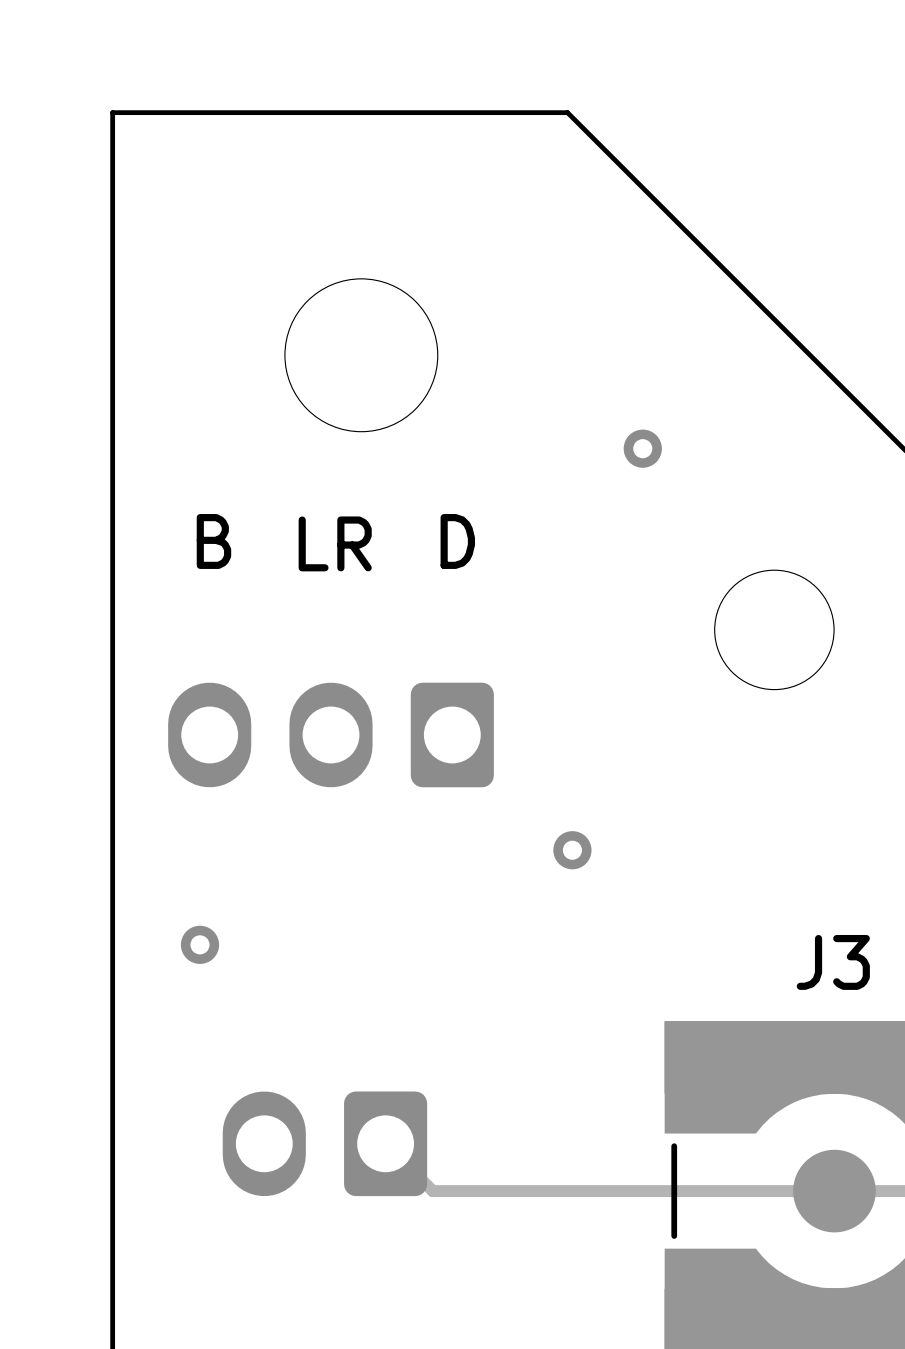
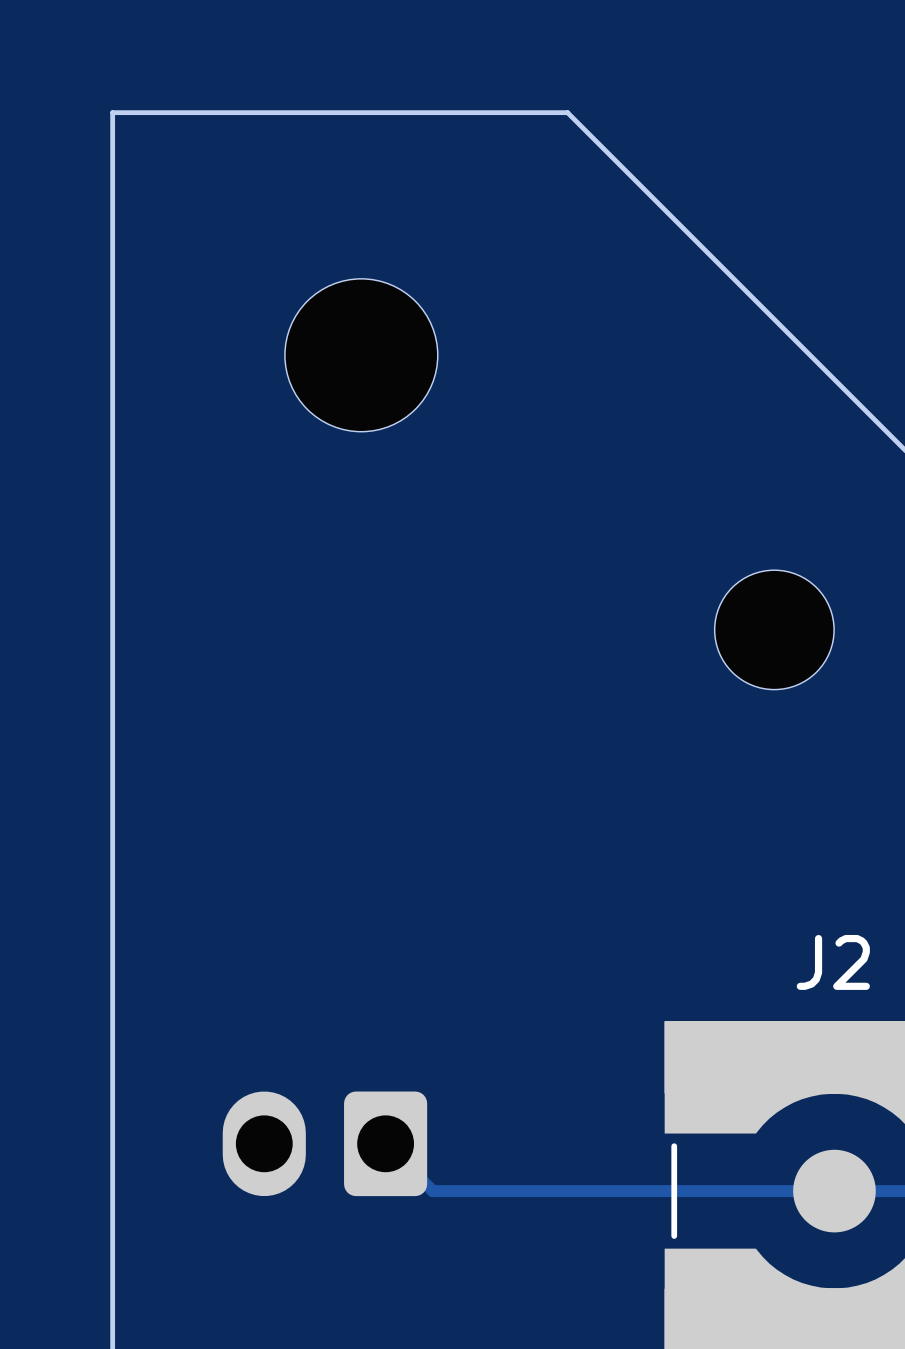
via: (642, 448) -> none
text: B (213, 541) -> none
text: D (457, 541) -> none
text: LR (335, 543) -> none
part: (331, 734) -> none
via: (572, 850) -> none
via: (199, 944) -> none
J3 name: J3 (833, 962) -> J2 (833, 962)

